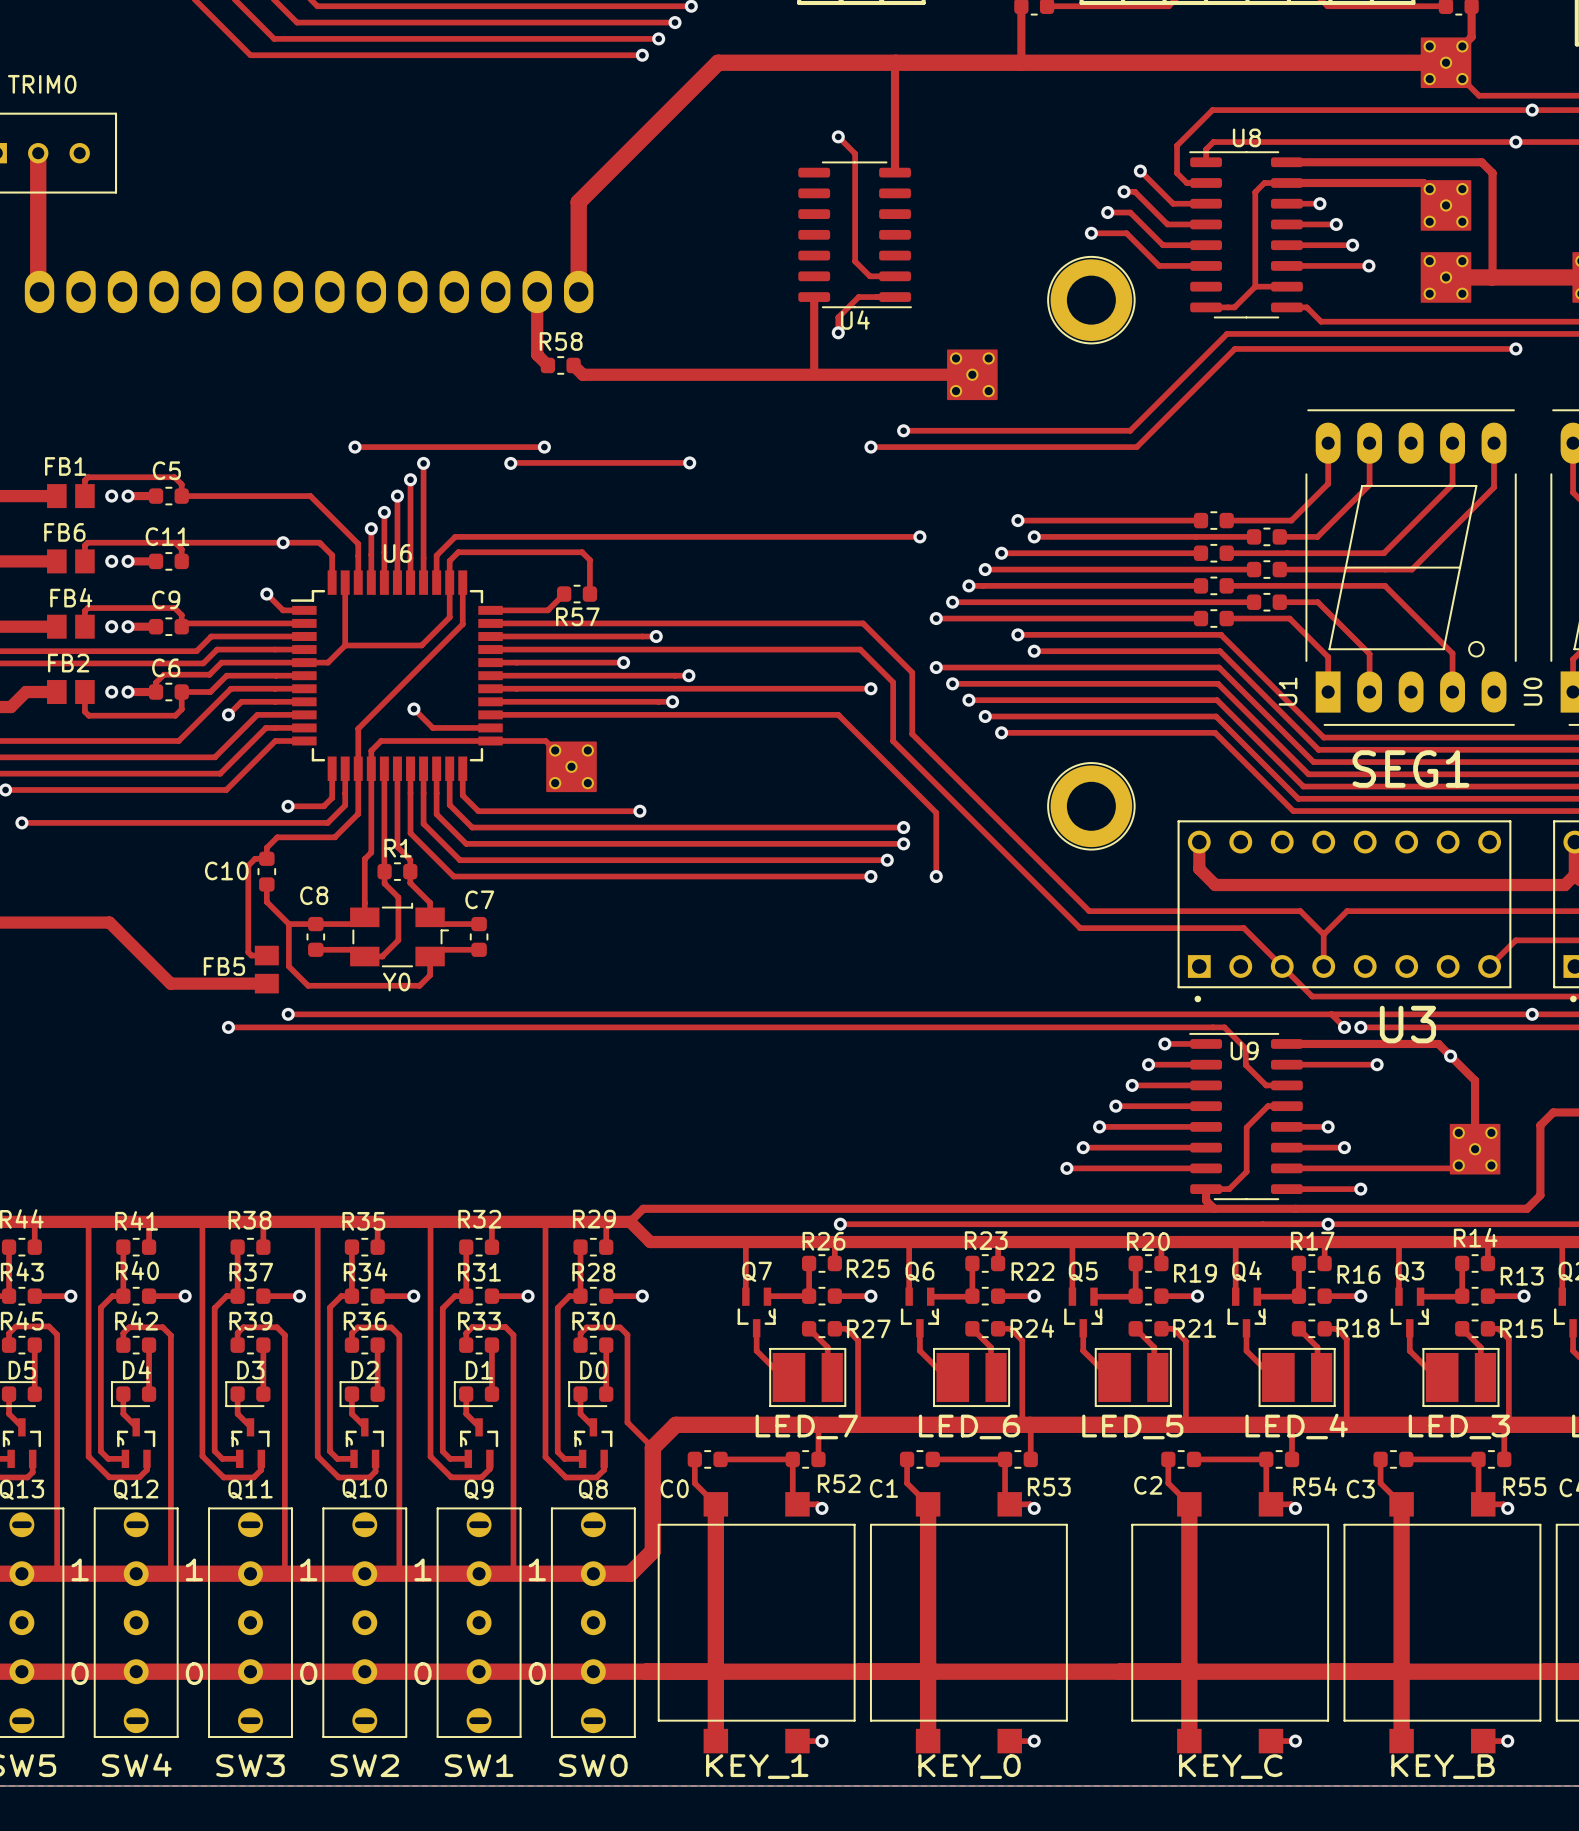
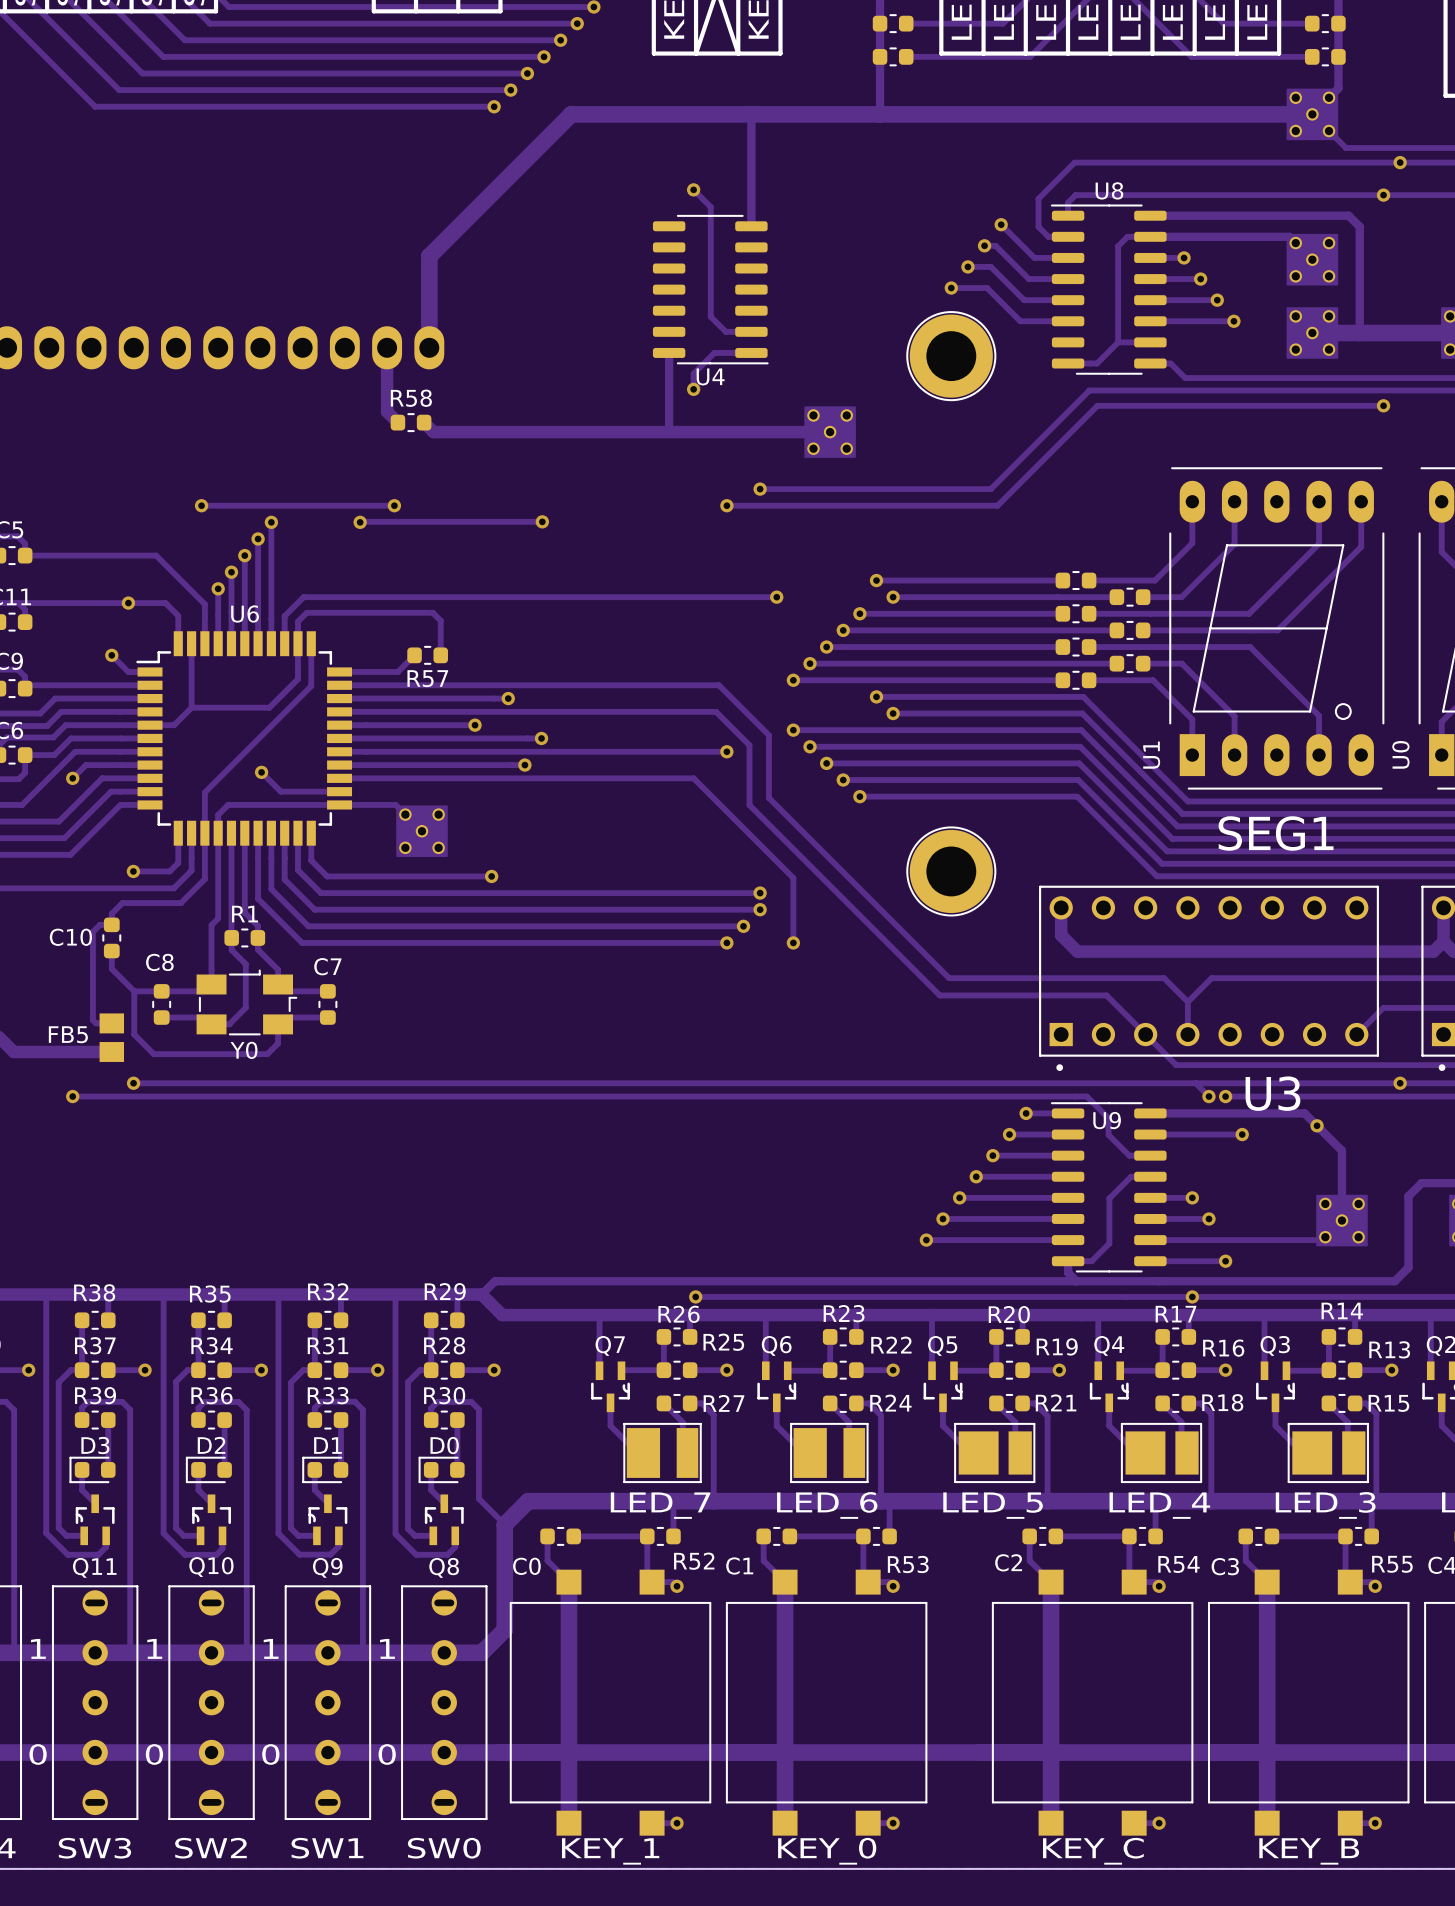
part footprint: [1094, 1347, 1172, 1408] -> [954, 1422, 1036, 1484]
part footprint: [1258, 1347, 1336, 1408] -> [1120, 1422, 1203, 1484]
part footprint: [1422, 1347, 1500, 1408] -> [1287, 1422, 1369, 1484]

